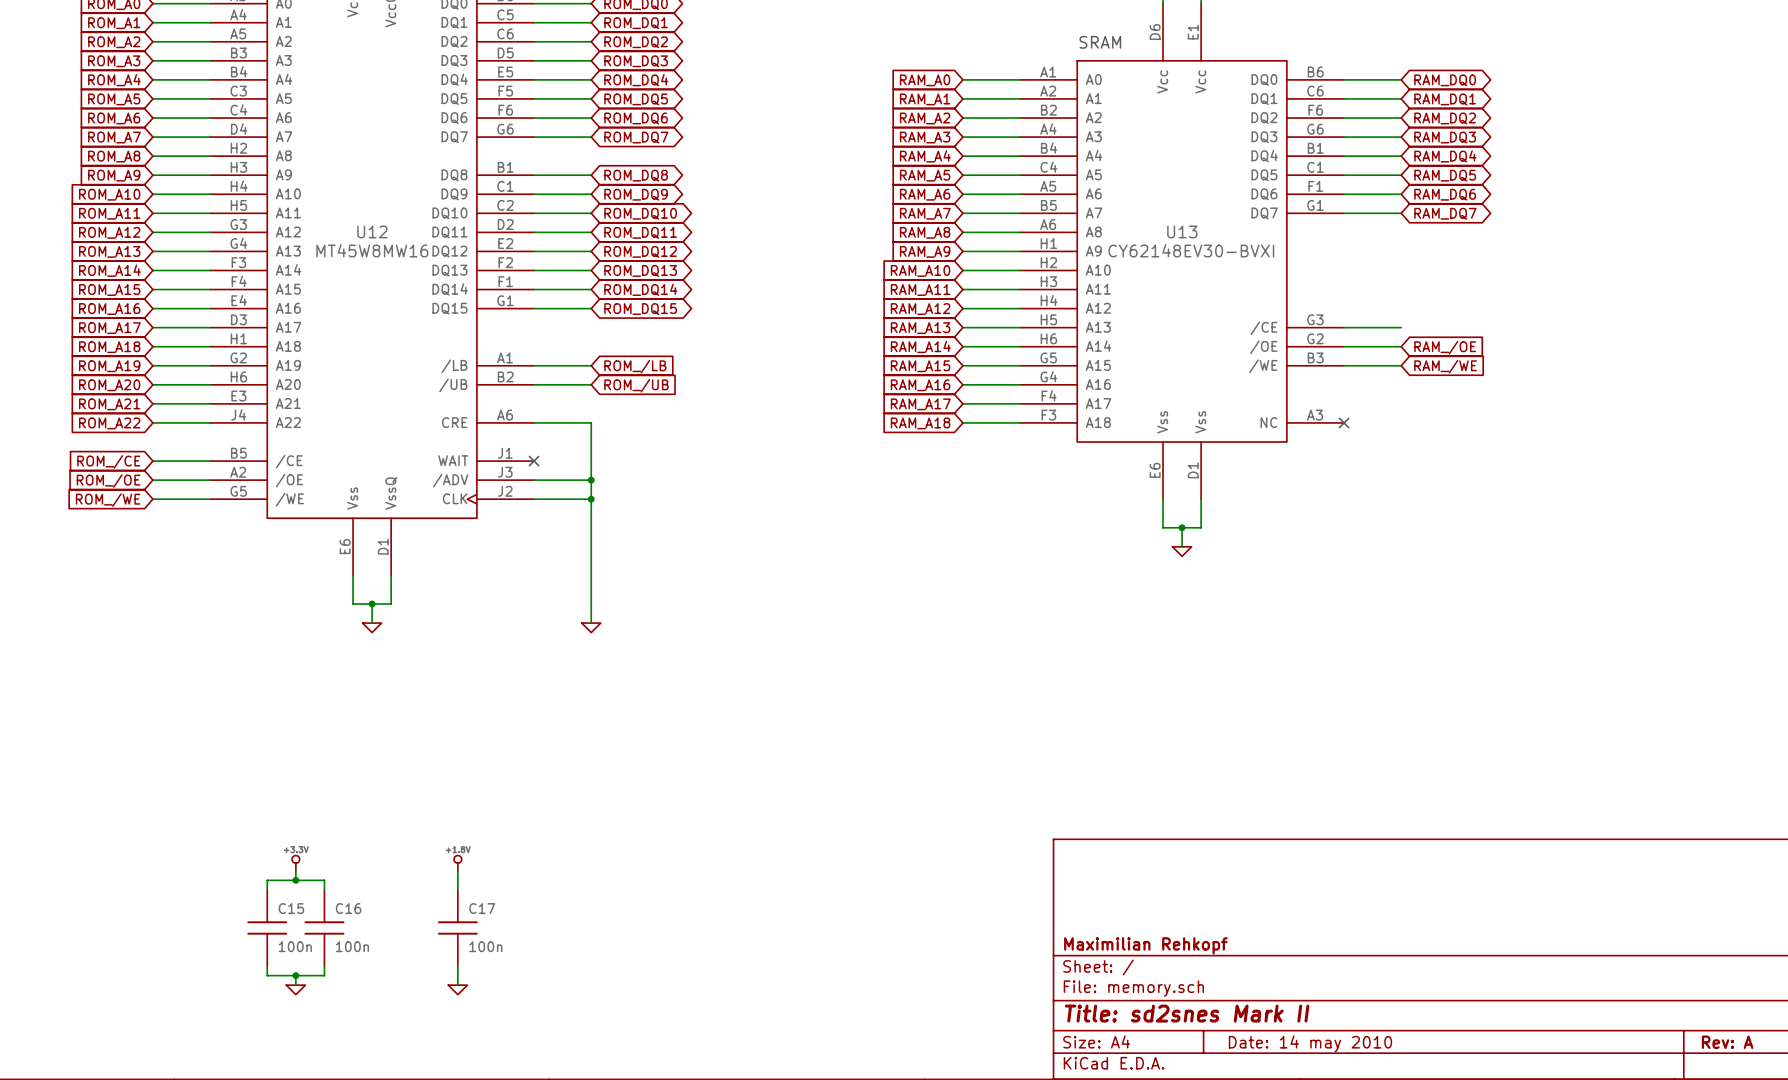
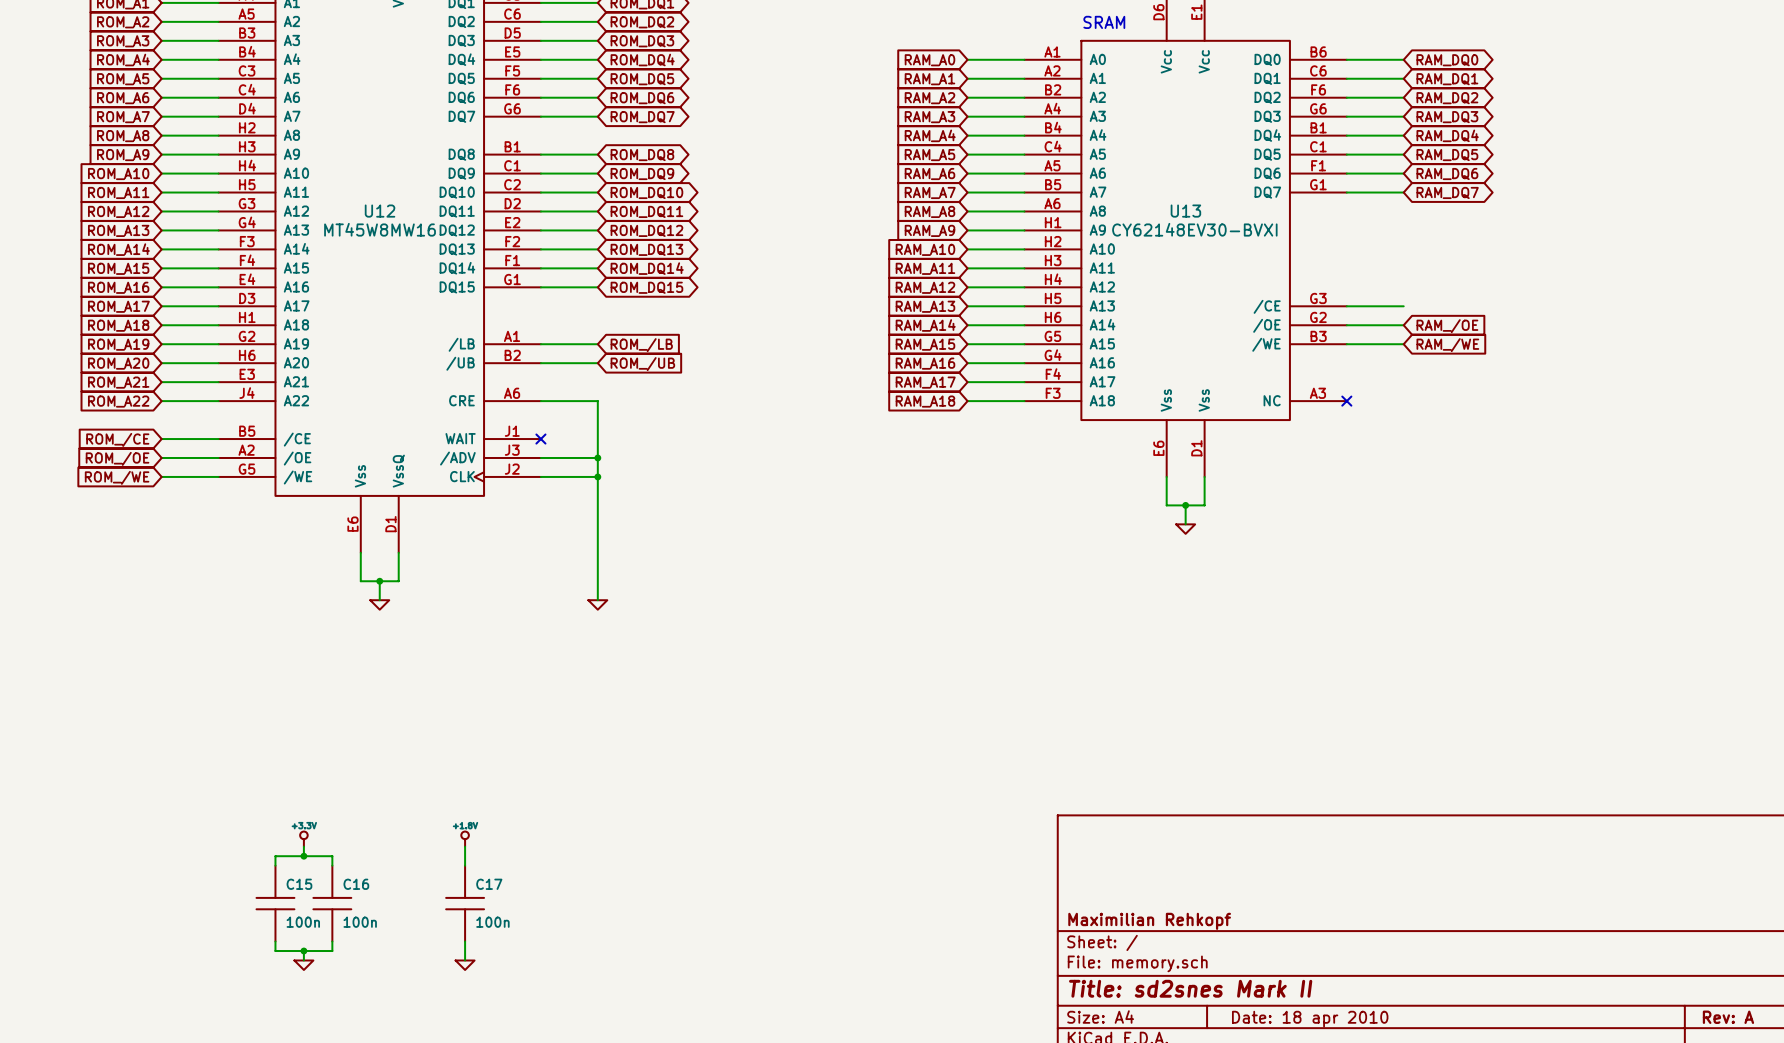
title block: Date: 14 may 2010 (1310, 1043) -> Date: 18 apr 2010 (1310, 1019)

